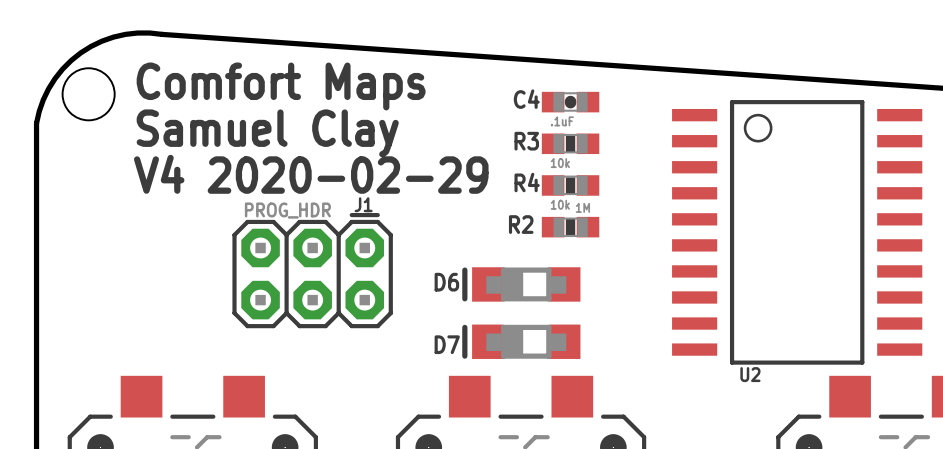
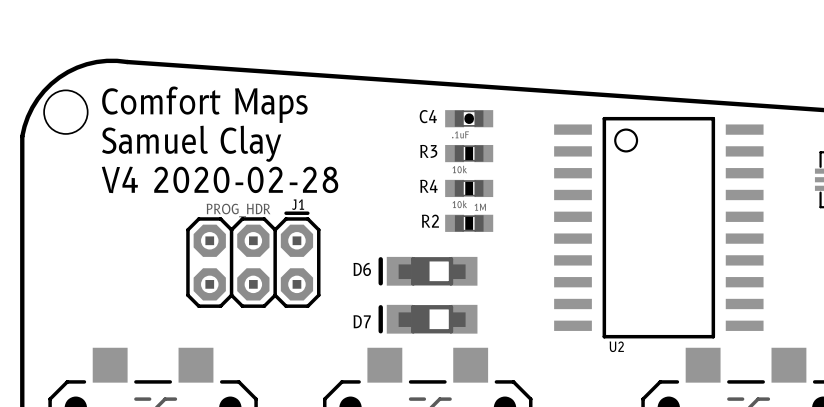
text: V4 2020-02-29 (311, 174) -> V4 2020-02-28 (220, 179)

